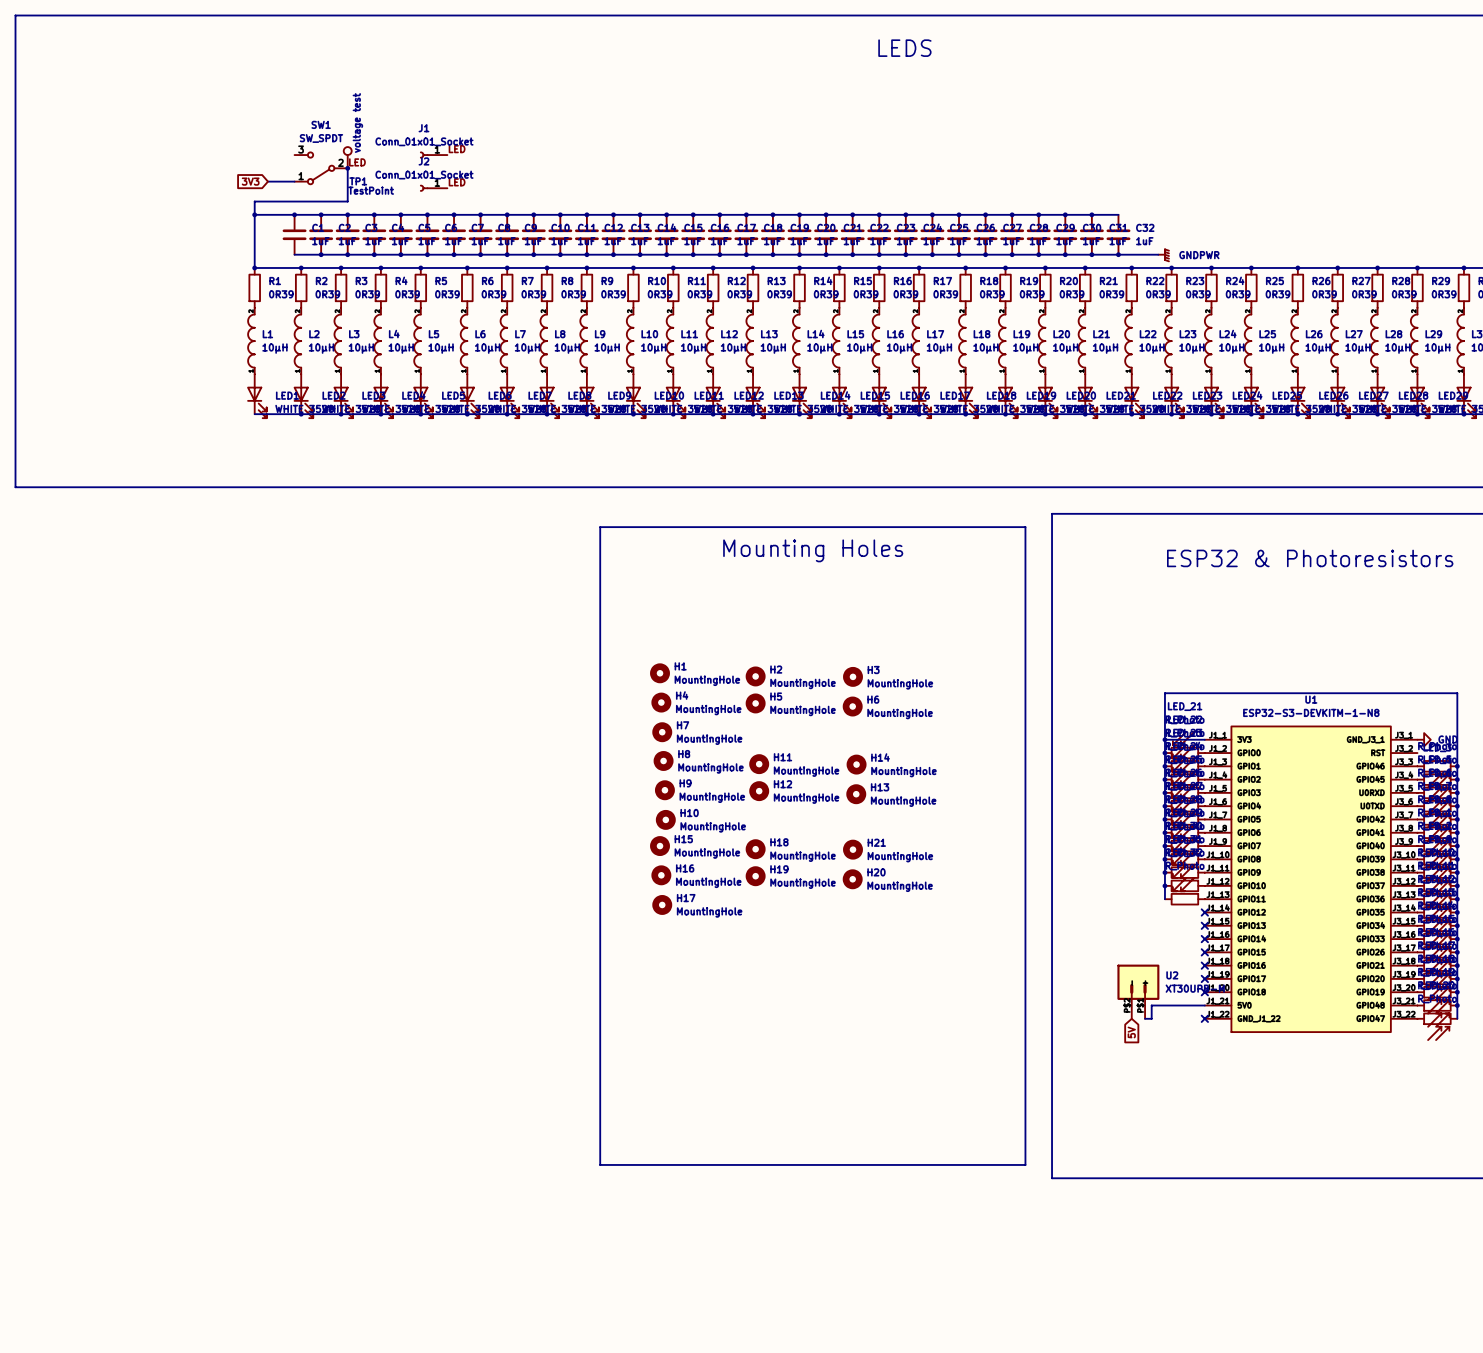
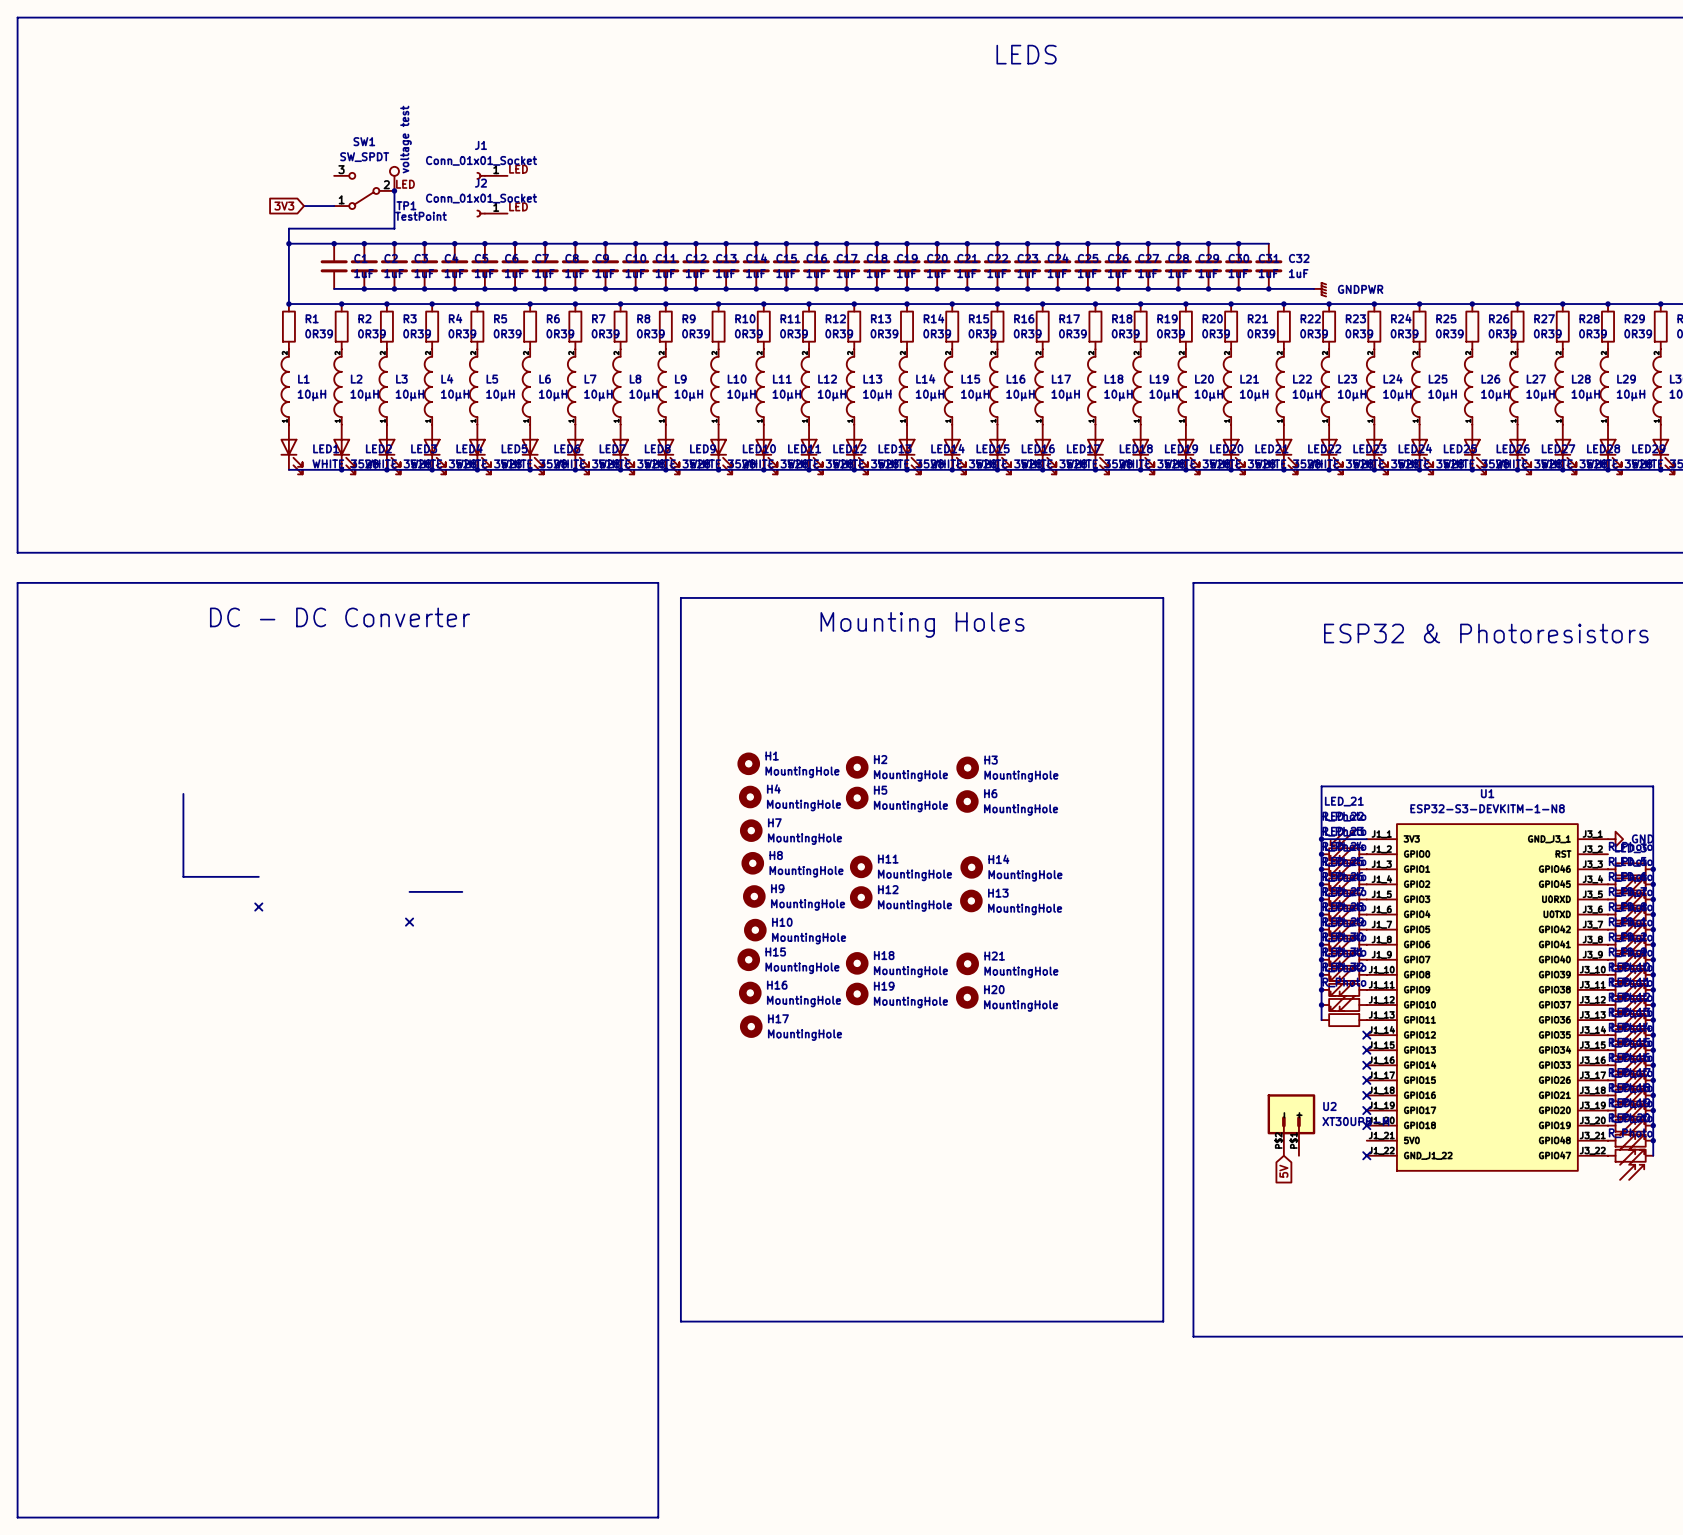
line: none -> (17, 582) (658, 582) (658, 1517) (17, 1517) (17, 582)
text: none -> DC - DC Converter (339, 617)
wire: none -> (183, 793) (183, 876) (258, 876)
wire: none -> (409, 891) (462, 891)
no-connect mark: none -> (258, 907)
no-connect mark: none -> (409, 922)
wire: (1204, 1005) (1151, 1005) (1151, 1018) (1145, 1018) -> none

